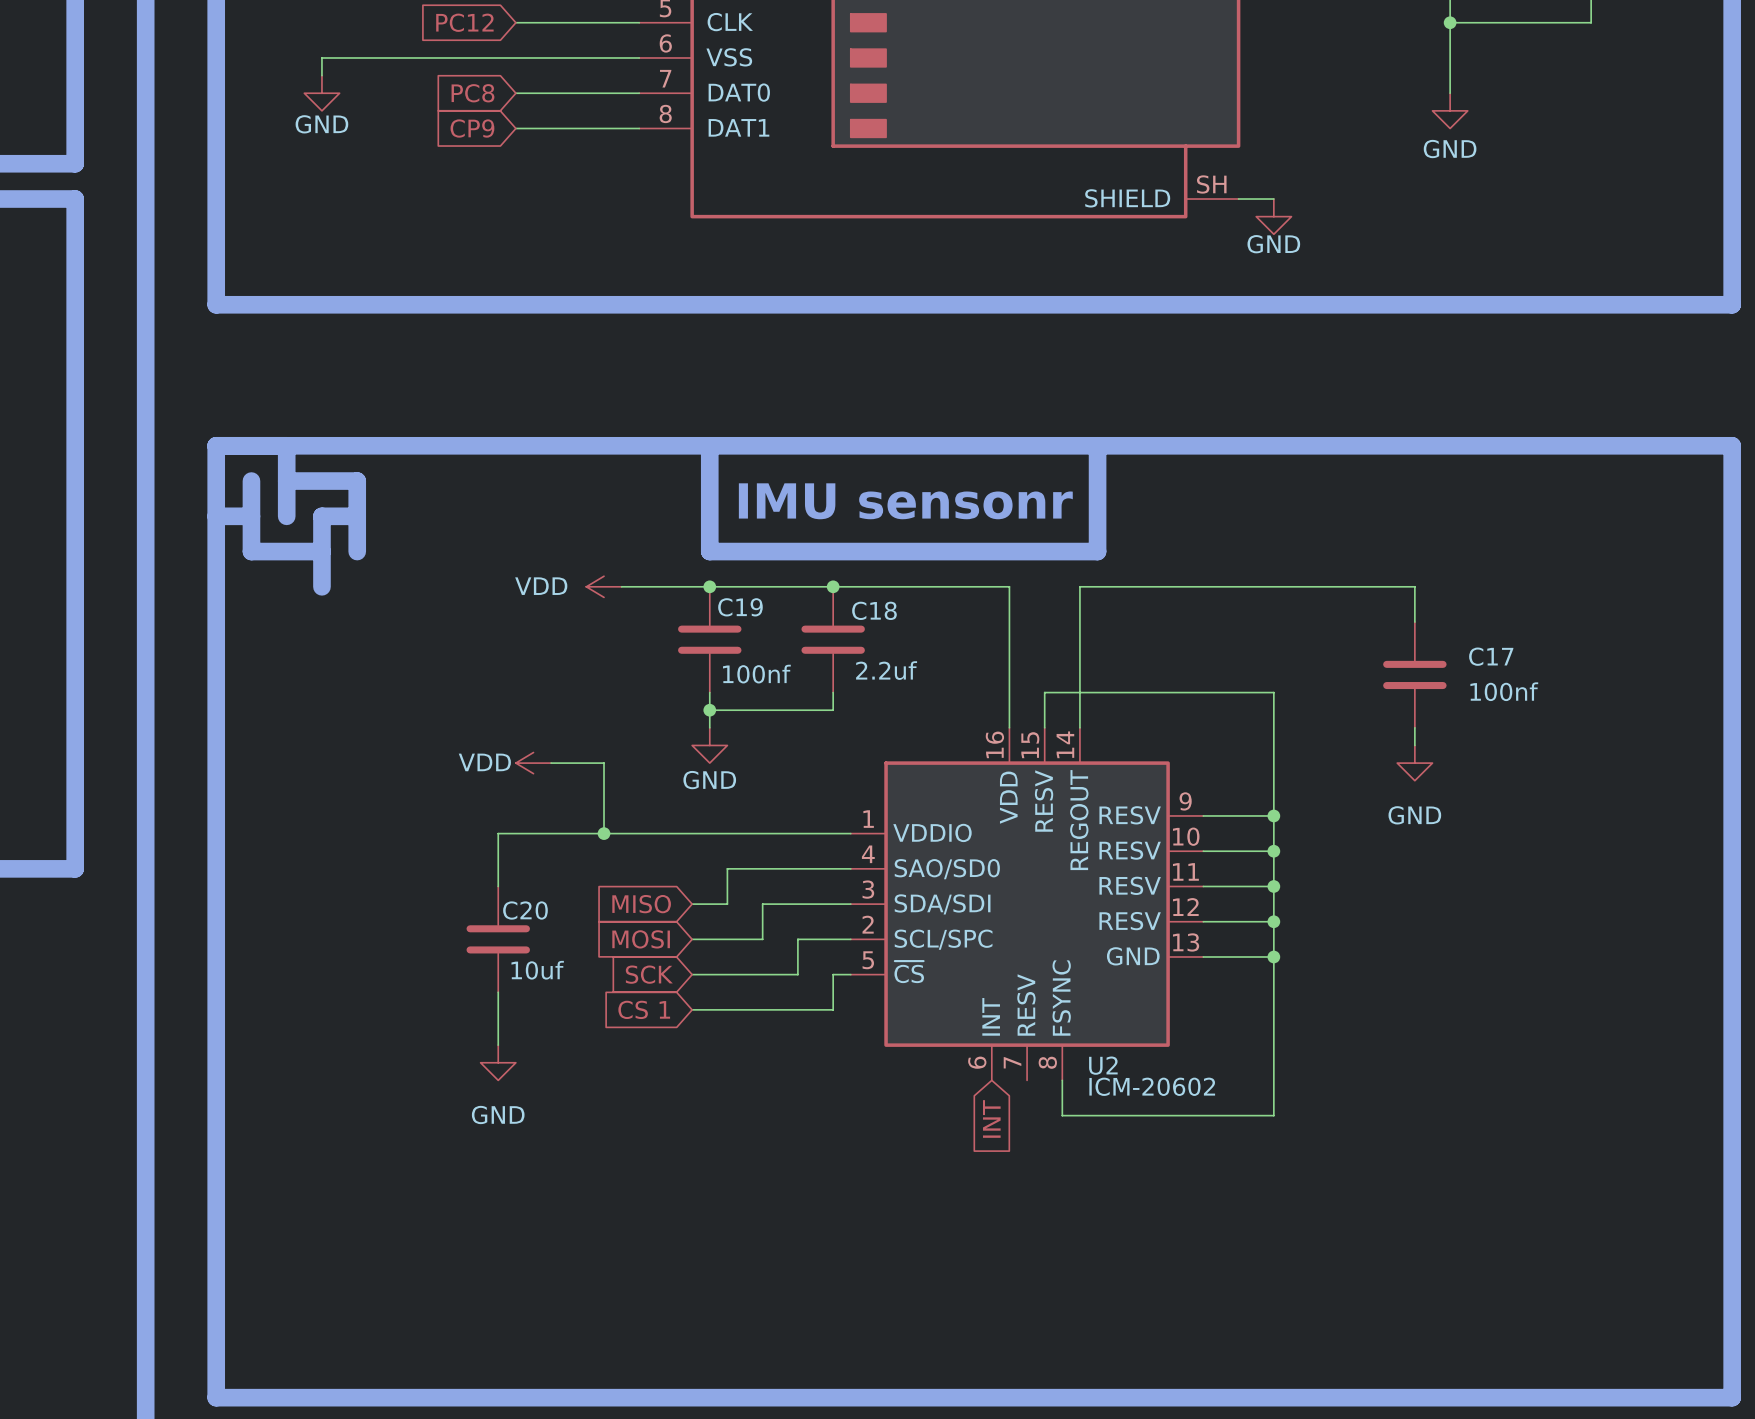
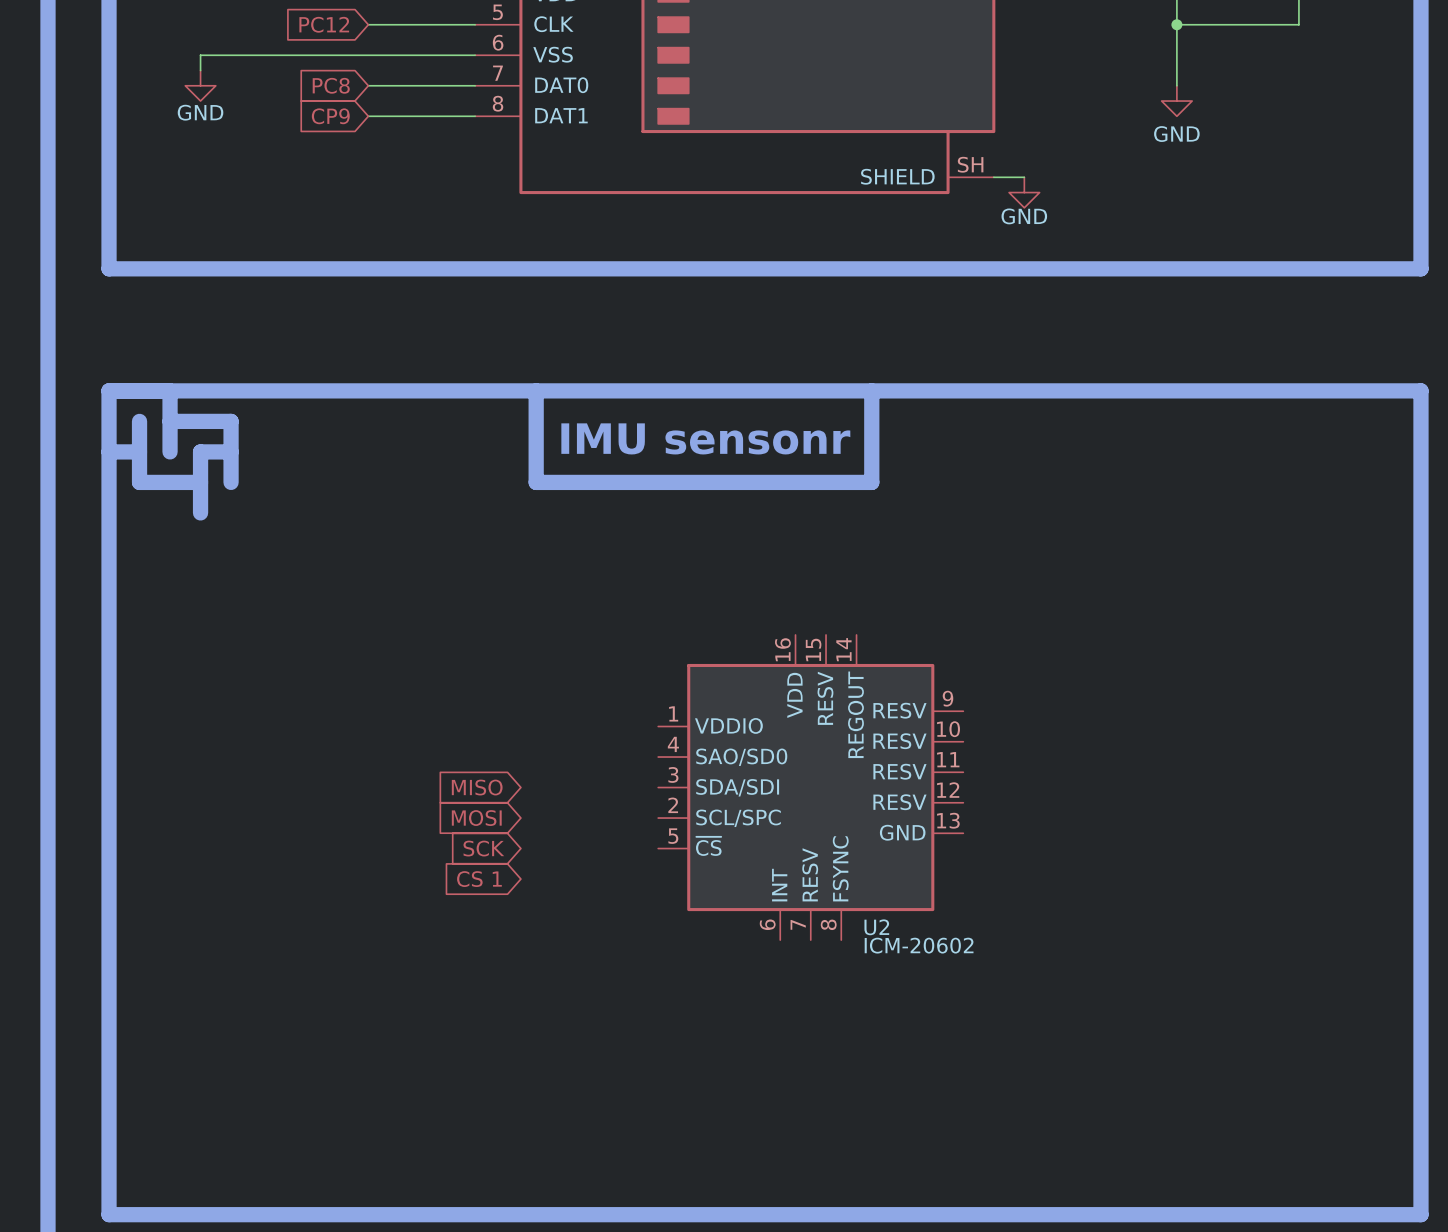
power symbol: VDD (604, 586) -> none
wire: (621, 586) (1009, 586) (1009, 727) -> none
junction: (709, 586) -> none
junction: (833, 586) -> none
wire: (1414, 622) (1414, 586) (1079, 586) (1079, 727) -> none
C19: 100nf (709, 639) -> none
C18: 2.2uf (833, 639) -> none
C17: 100nf (1414, 674) -> none
wire: (709, 692) (709, 727) -> none
wire: (833, 692) (833, 710) (709, 710) -> none
junction: (709, 710) -> none
wire: (1044, 727) (1044, 692) (1273, 692) (1273, 1115) (1062, 1115) (1062, 1080) -> none
wire: (1414, 727) (1414, 745) -> none
power symbol: GND (709, 745) -> none
power symbol: VDD (533, 763) -> none
wire: (551, 763) (604, 763) (604, 833) -> none
power symbol: GND (1414, 763) -> none
wire: (1203, 815) (1273, 815) -> none
junction: (1273, 815) -> none
junction: (604, 833) -> none
wire: (850, 833) (498, 833) (498, 886) -> none
wire: (1203, 851) (1273, 851) -> none
junction: (1273, 851) -> none
wire: (850, 868) (727, 868) (727, 904) (692, 904) -> none
wire: (1203, 886) (1273, 886) -> none
junction: (1273, 886) -> none
wire: (850, 904) (762, 904) (762, 939) (692, 939) -> none
wire: (1203, 921) (1273, 921) -> none
junction: (1273, 921) -> none
C20: 10uf (498, 939) -> none
wire: (850, 939) (797, 939) (797, 974) (692, 974) -> none
wire: (1203, 956) (1273, 956) -> none
junction: (1273, 956) -> none
wire: (850, 974) (833, 974) (833, 1009) (692, 1009) -> none
wire: (498, 992) (498, 1045) -> none
power symbol: GND (498, 1062) -> none
global label: INT (991, 1118) -> none

